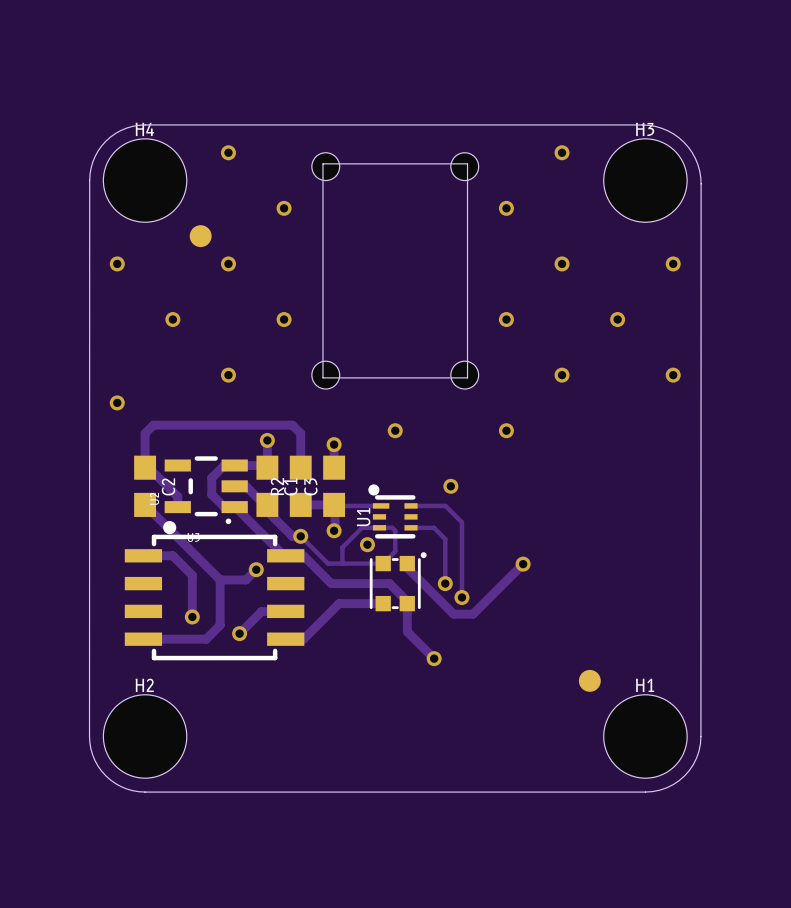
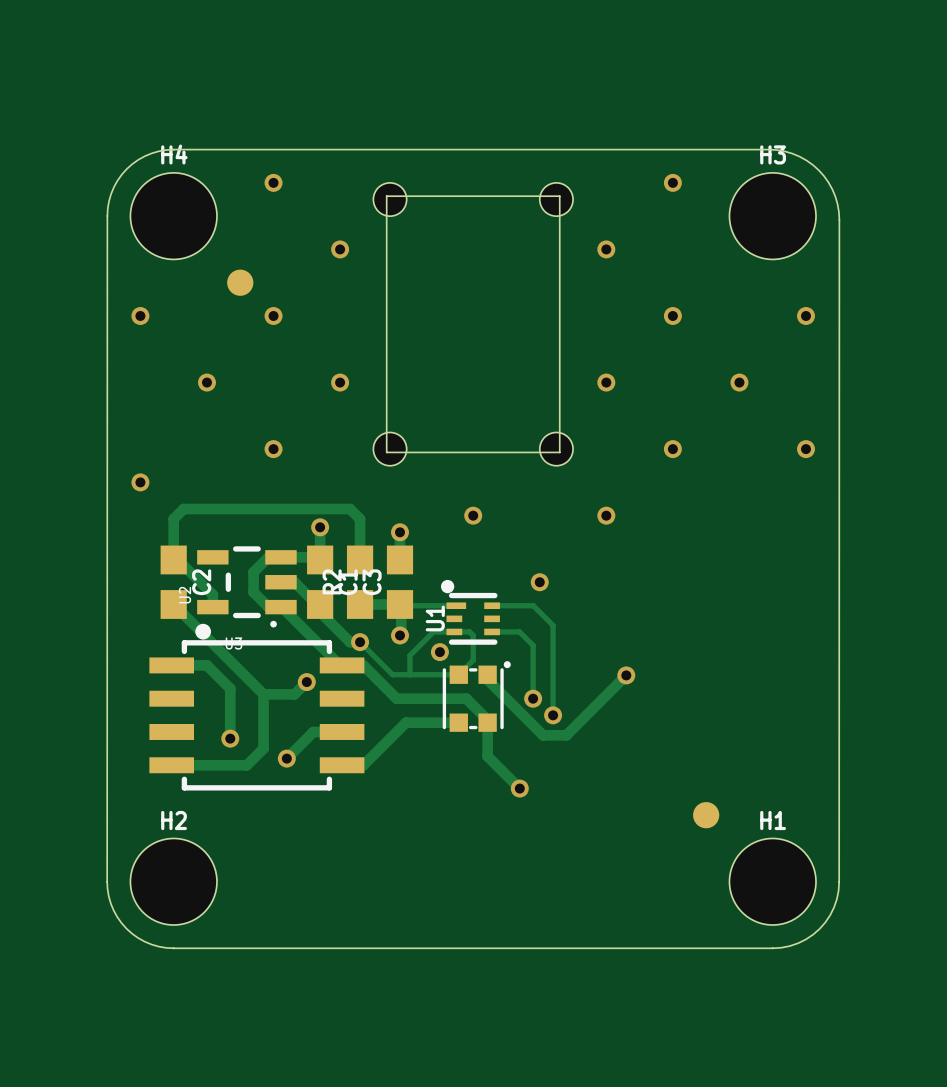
H4 footprint: [103, 138, 187, 223] -> [130, 172, 217, 260]
H3 footprint: [603, 138, 688, 223] -> [729, 172, 816, 260]
H2 footprint: [103, 694, 187, 779] -> [130, 838, 217, 926]
H1 footprint: [603, 694, 688, 779] -> [729, 838, 816, 926]

